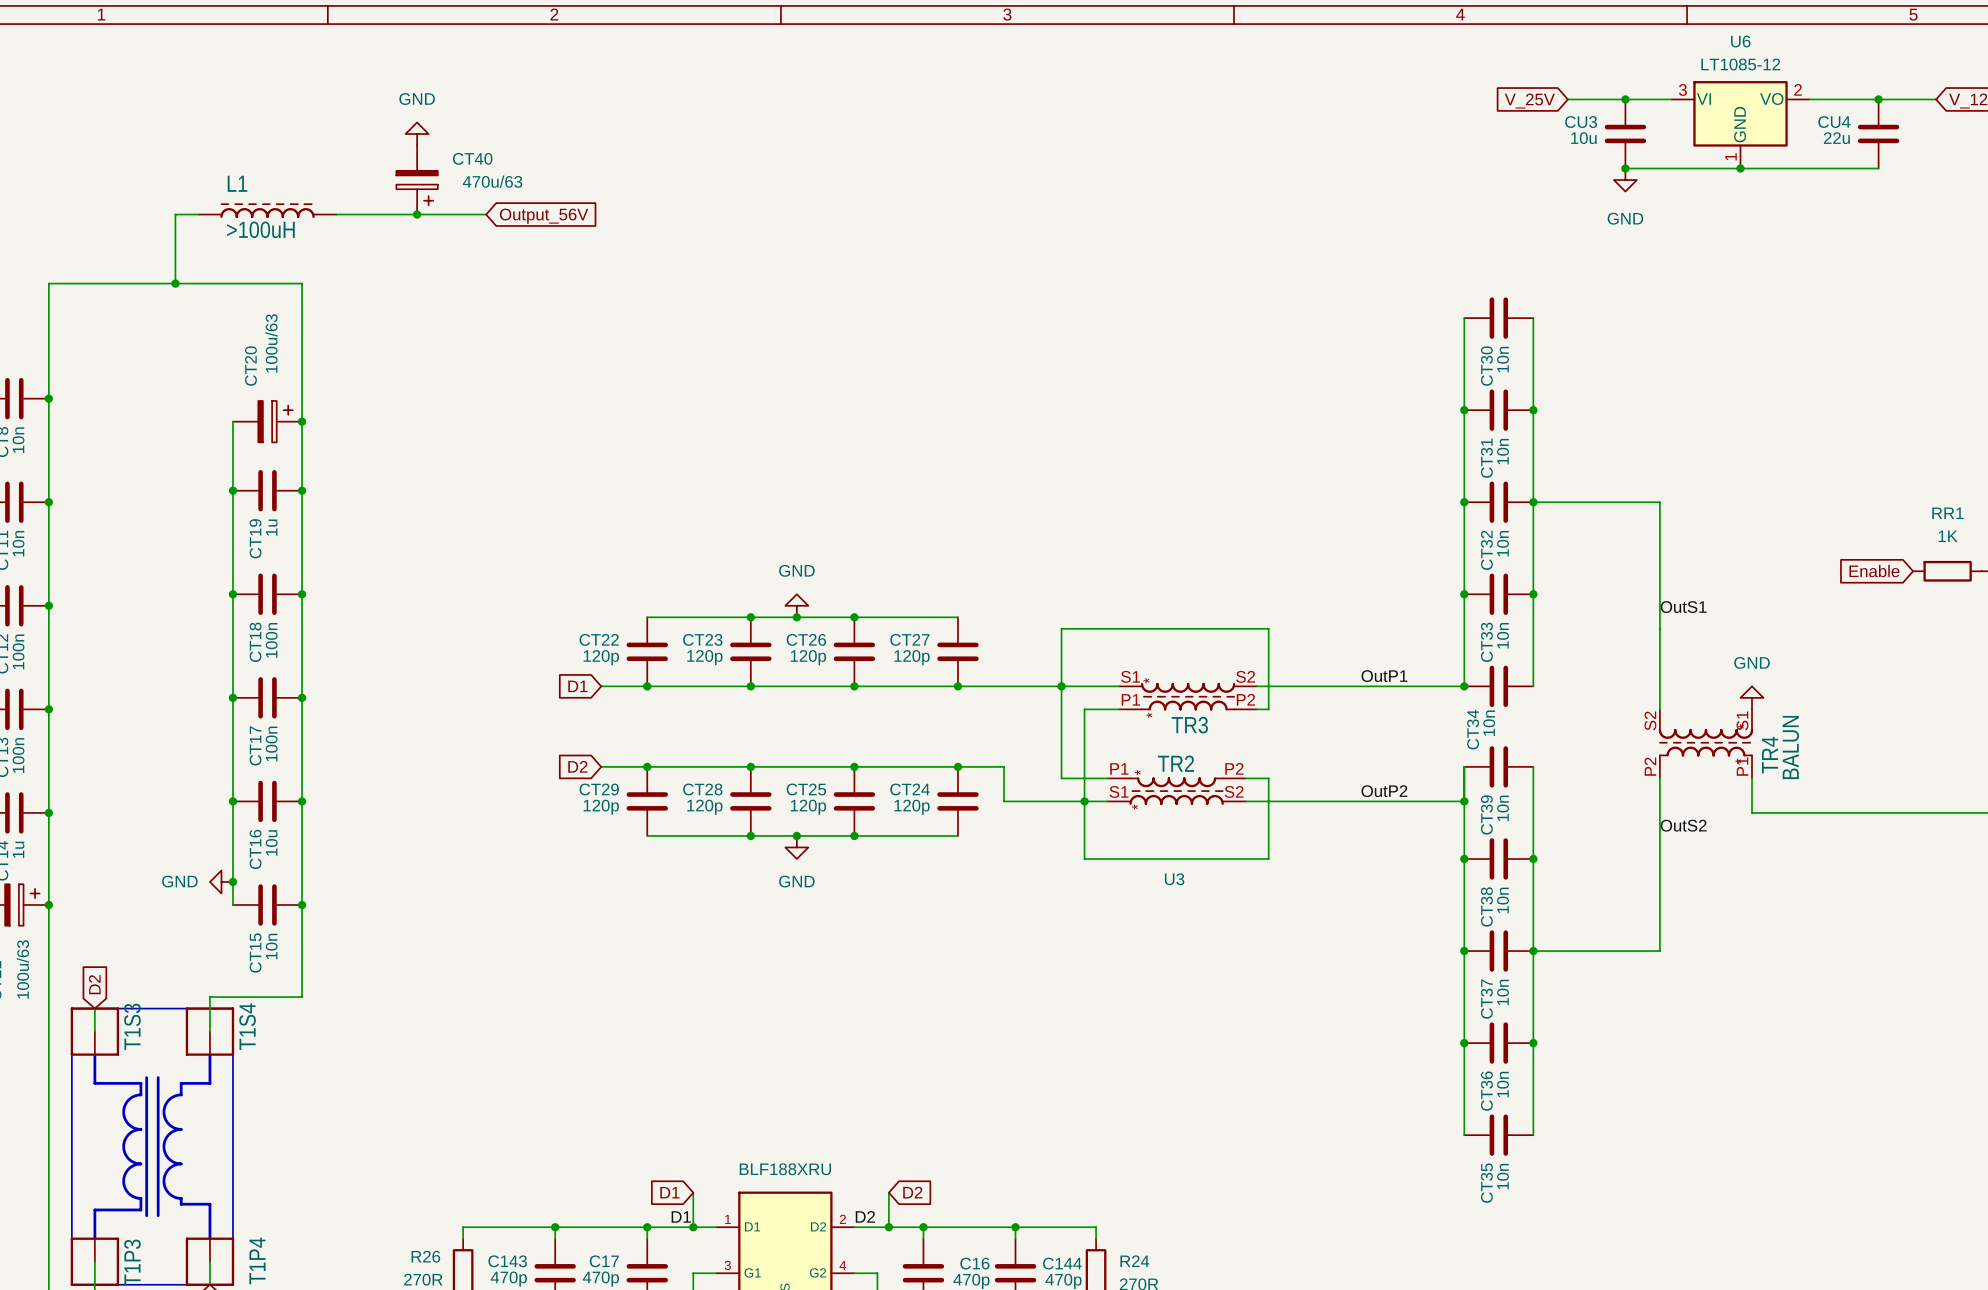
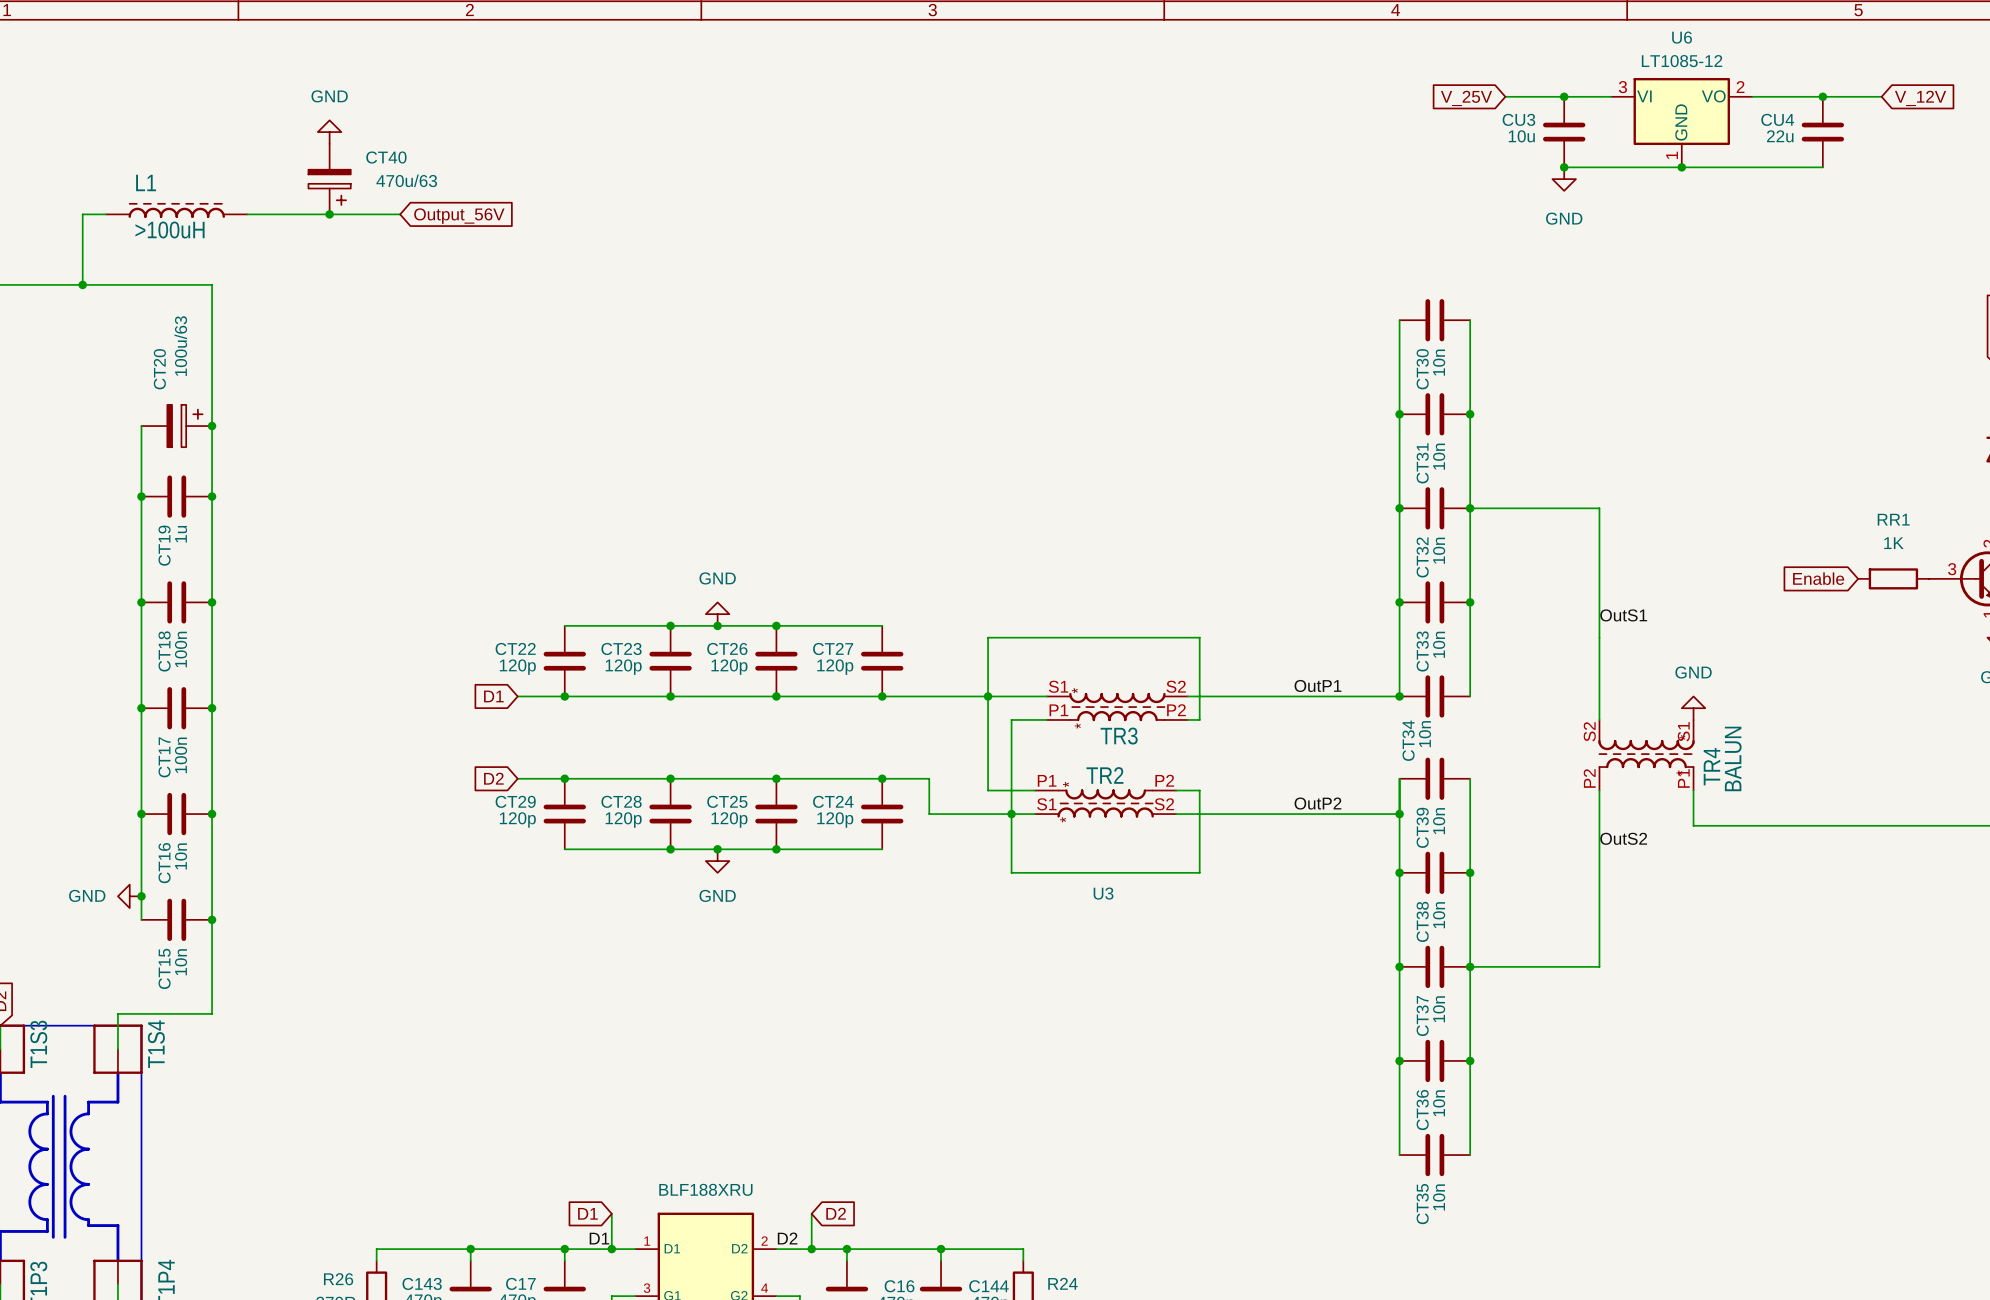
CT16 value: 10u (271, 842) -> 10n (181, 856)

